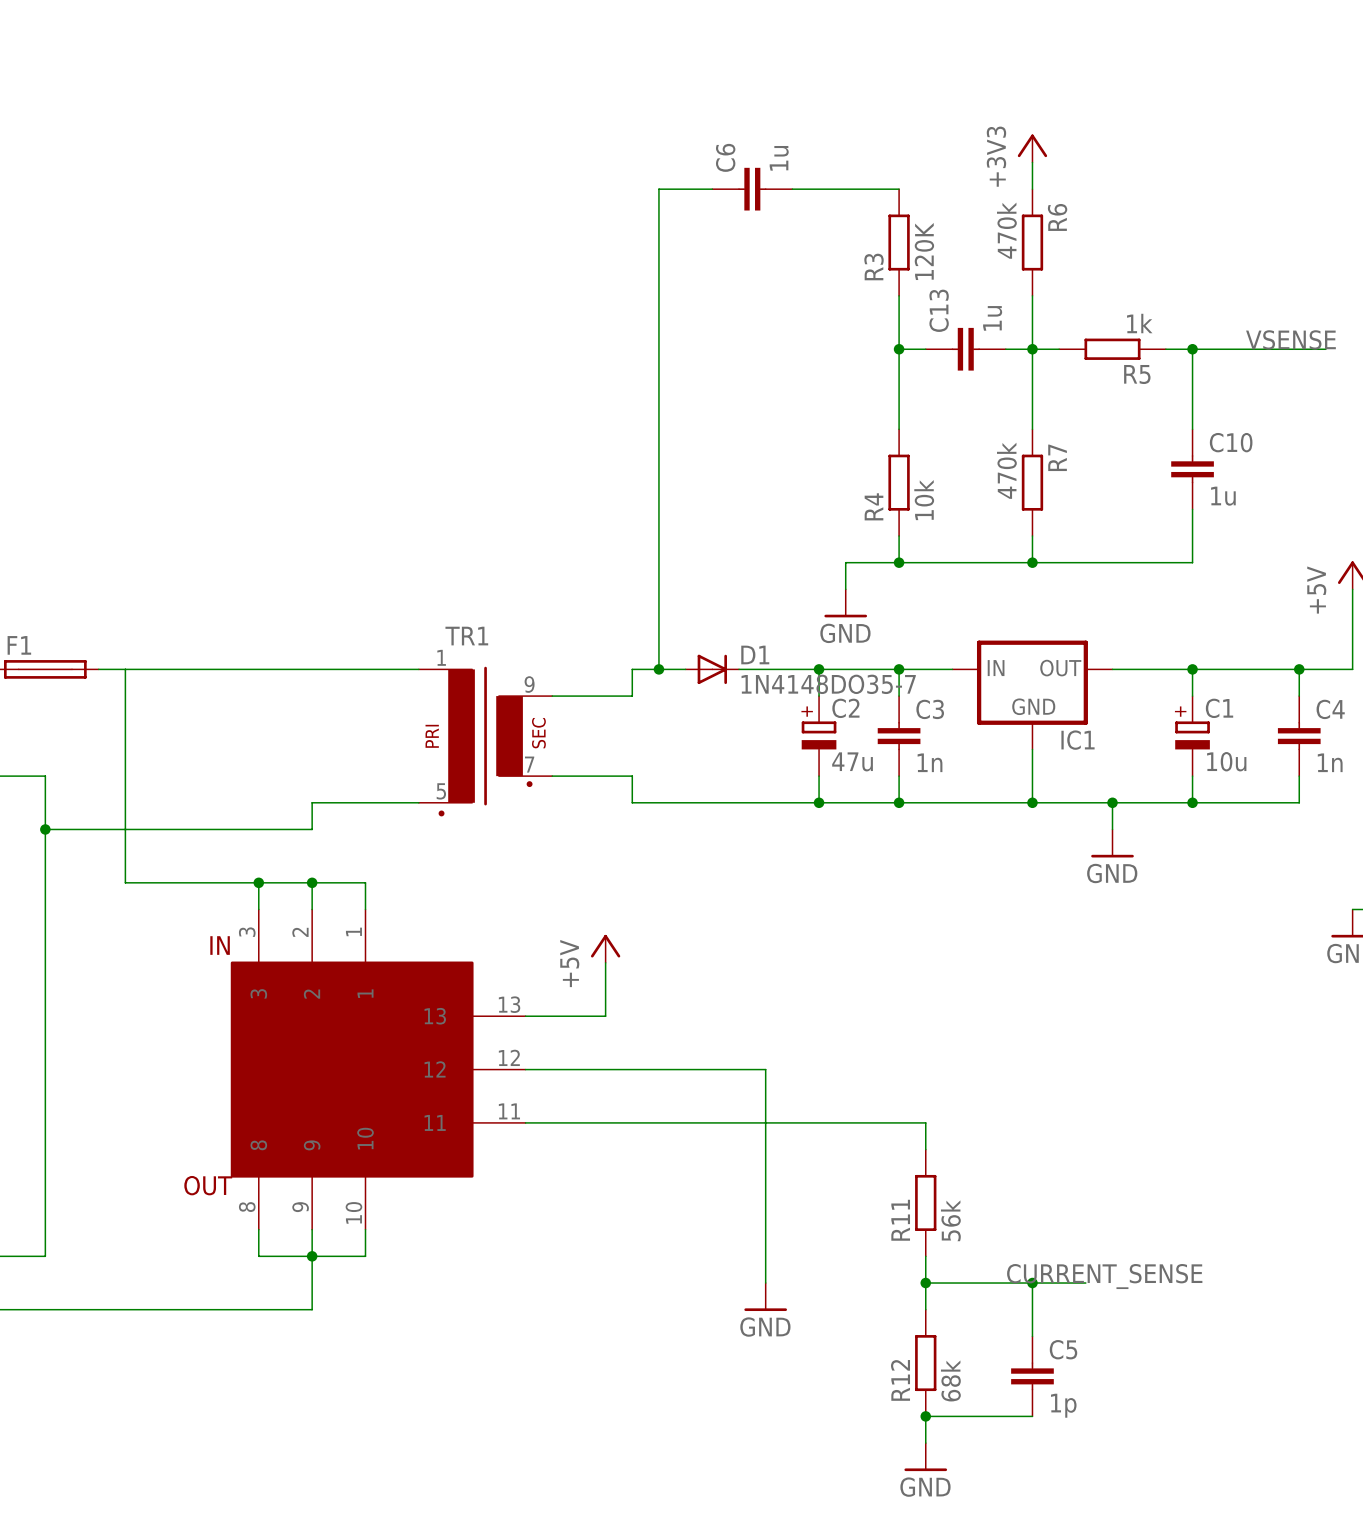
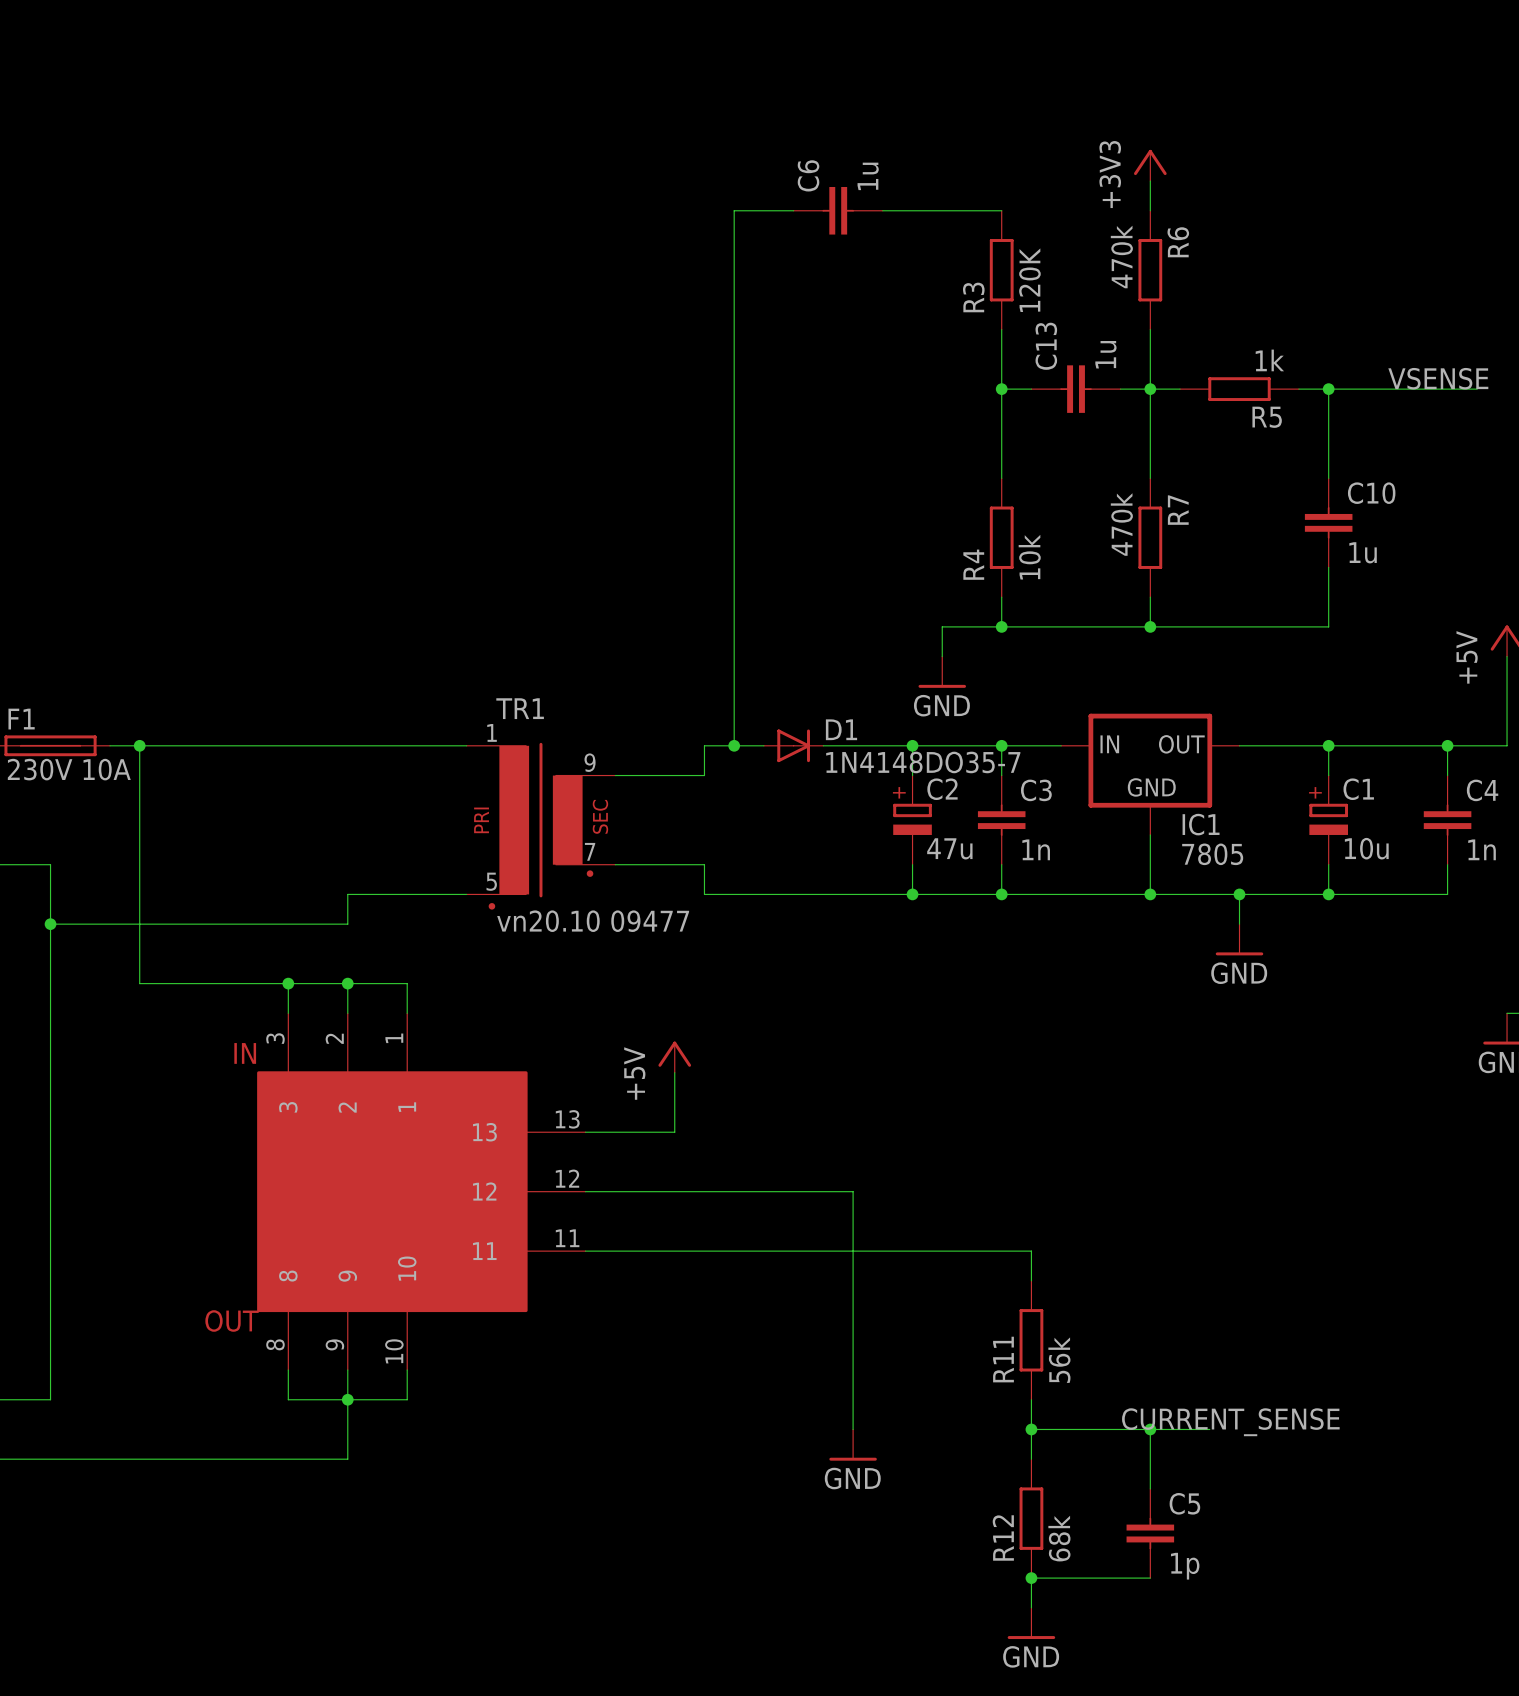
junction: none -> (139, 745)
F1 value: none -> 230V 10A (69, 769)
IC1 value: none -> 7805 (1212, 854)
TR1 value: none -> vn20.10 09477 (593, 921)

